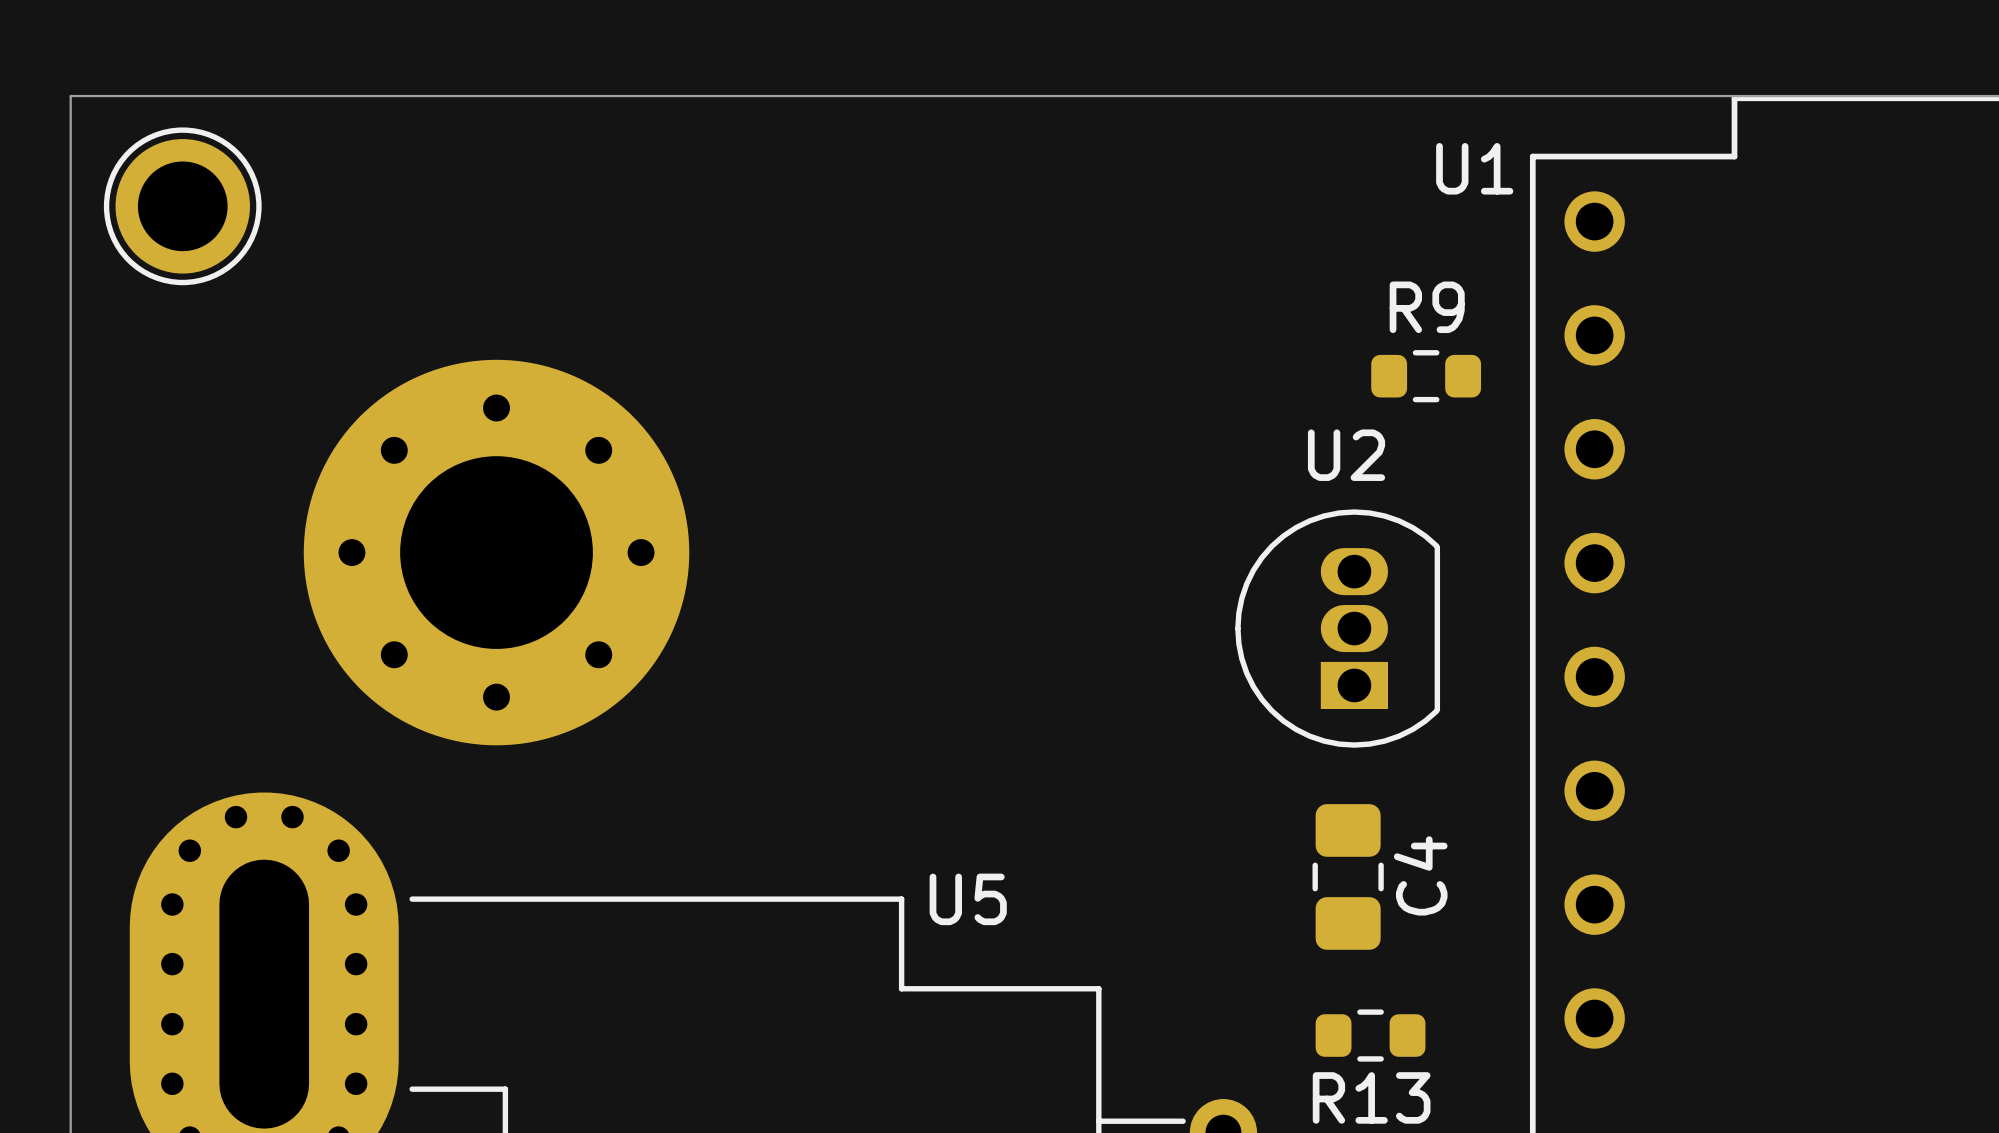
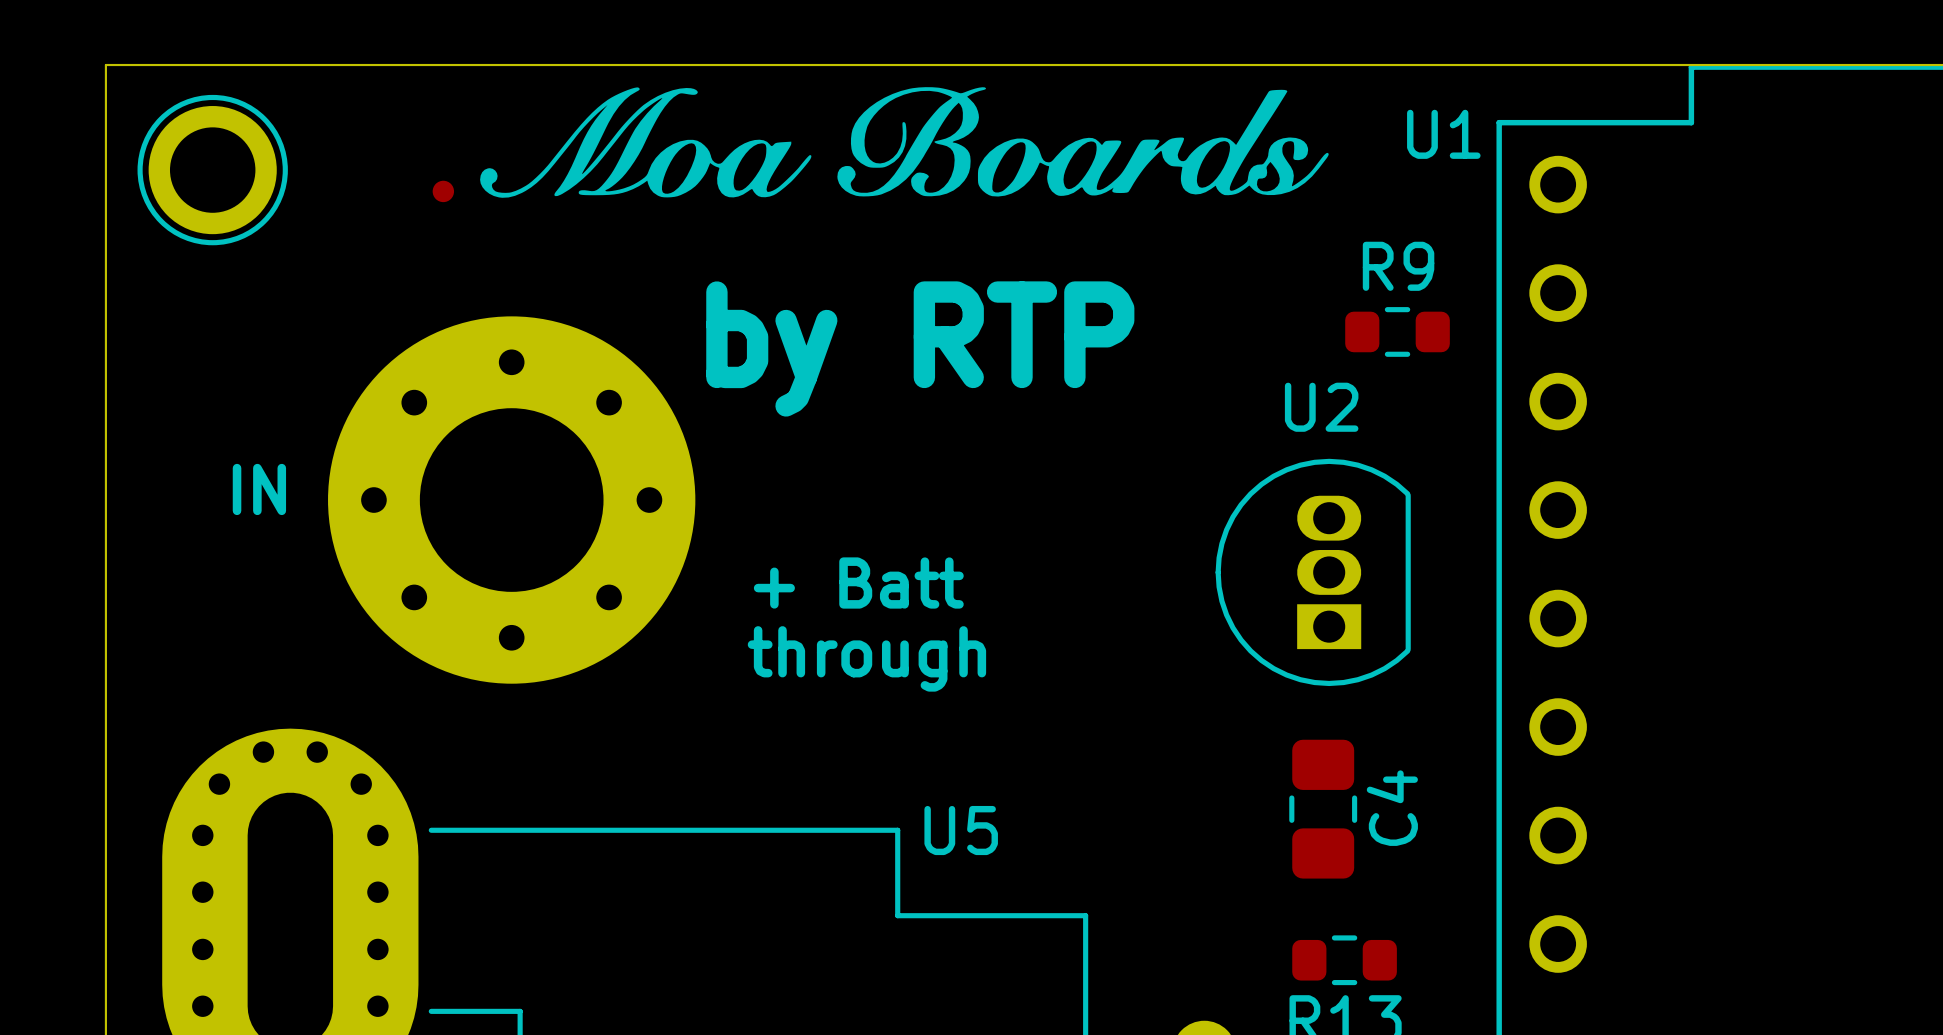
drawing: none -> [480, 87, 1329, 198]
part: none -> (443, 191)
text: none -> by RTP (920, 348)
text: none -> IN (259, 489)
text: none -> + Batt (858, 583)
text: none -> through (866, 658)

